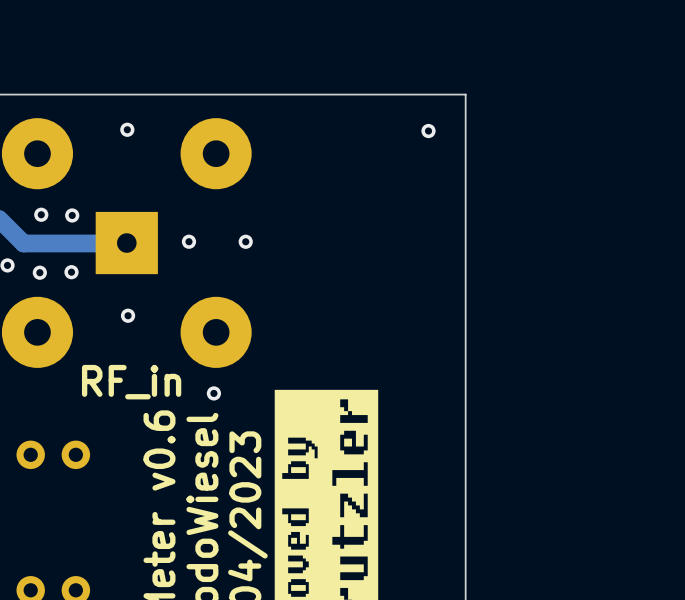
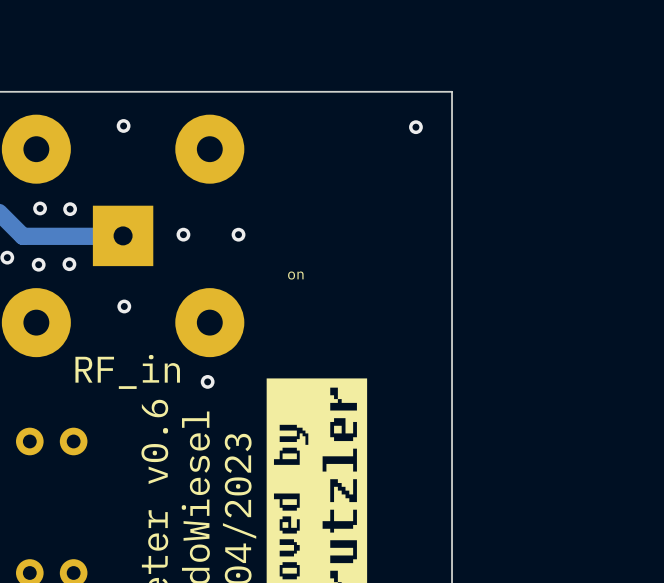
text: none -> on (295, 275)

